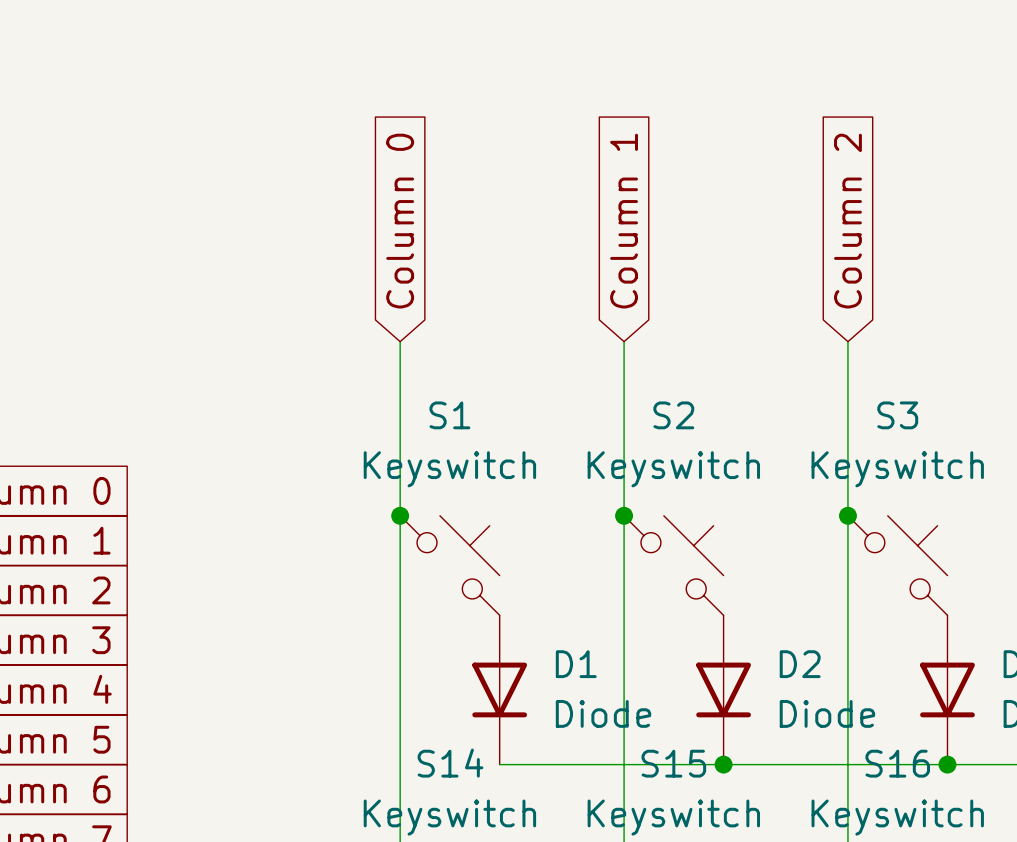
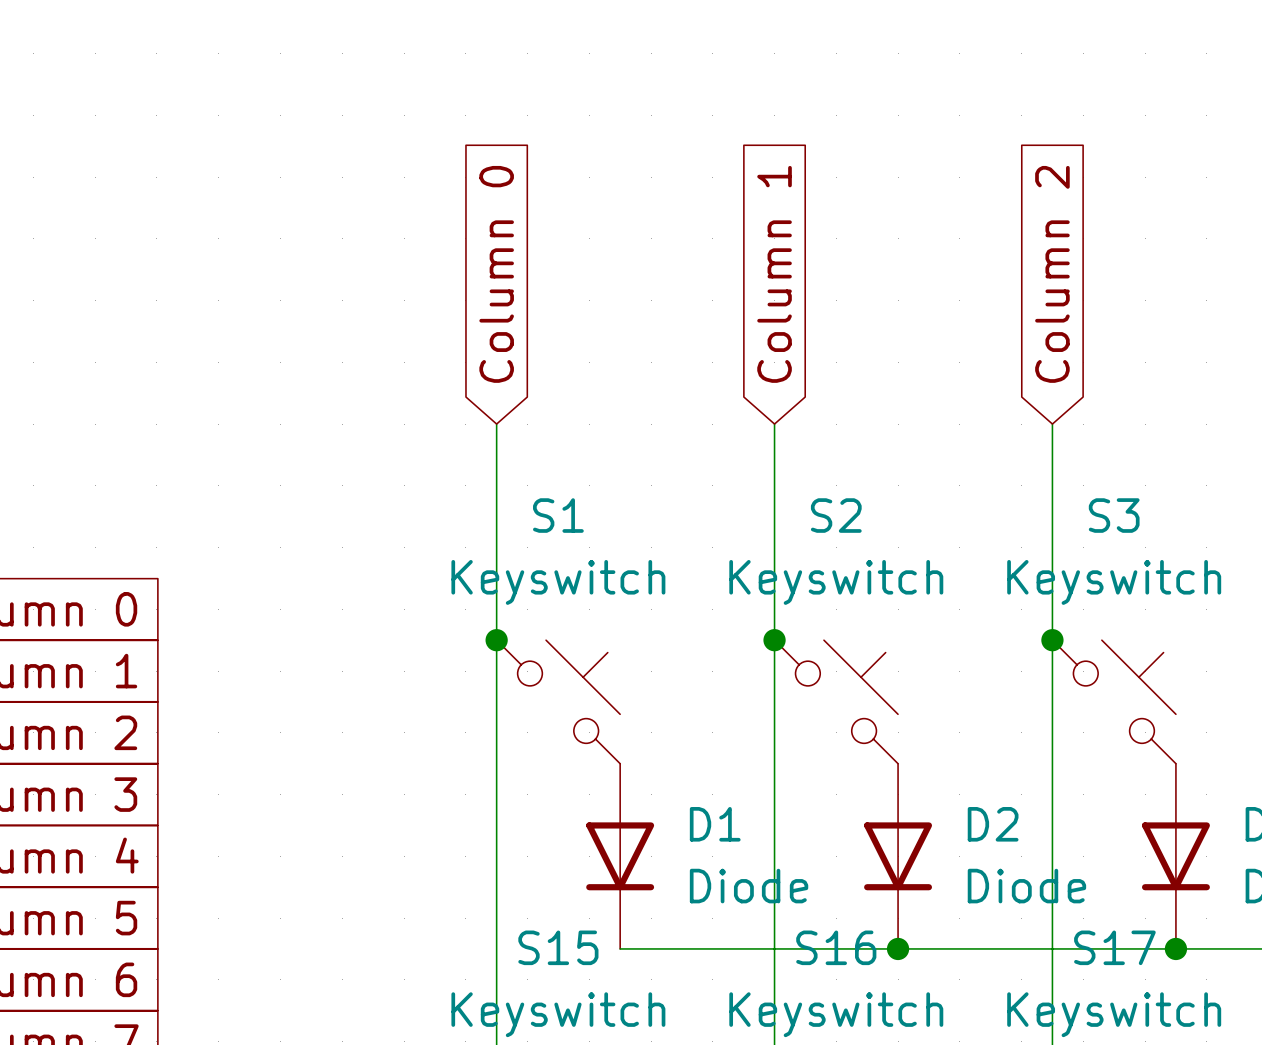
S14 name: S14 (450, 763) -> S15 (558, 947)
S15 name: S15 (673, 763) -> S16 (836, 947)
S16 name: S16 (897, 763) -> S17 (1114, 947)

